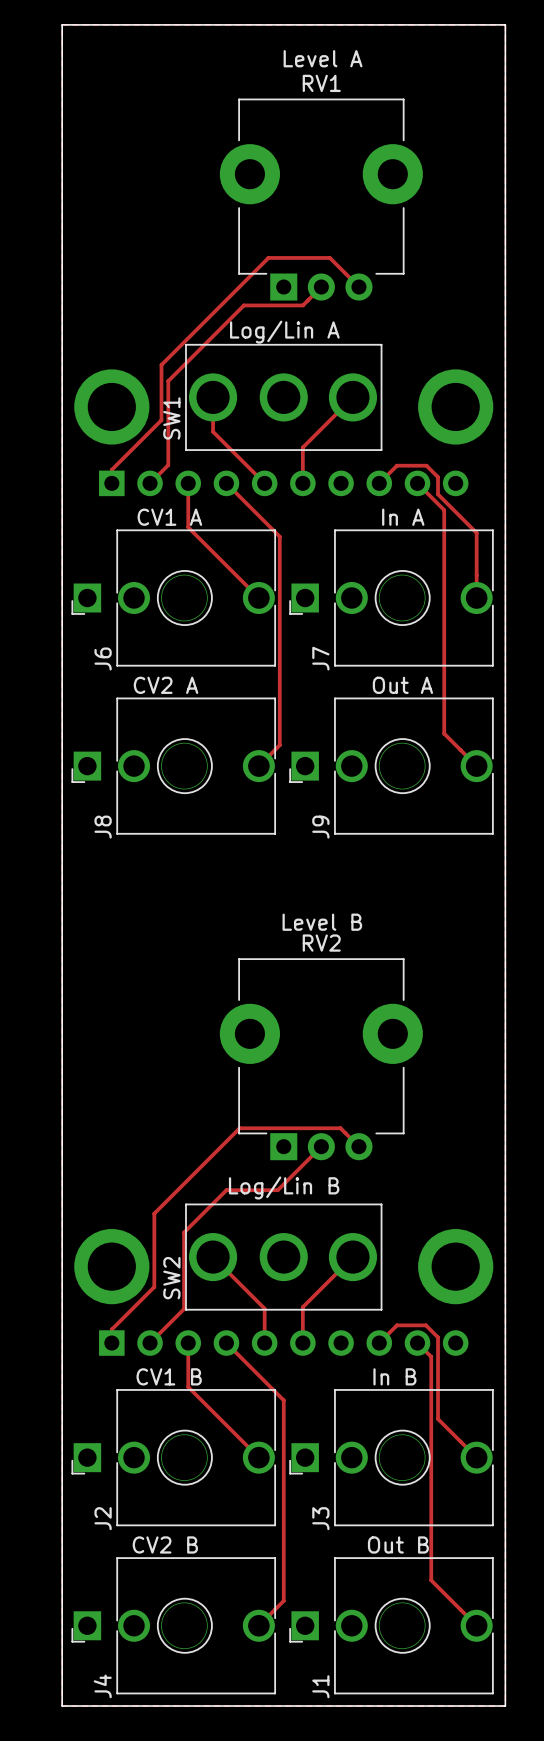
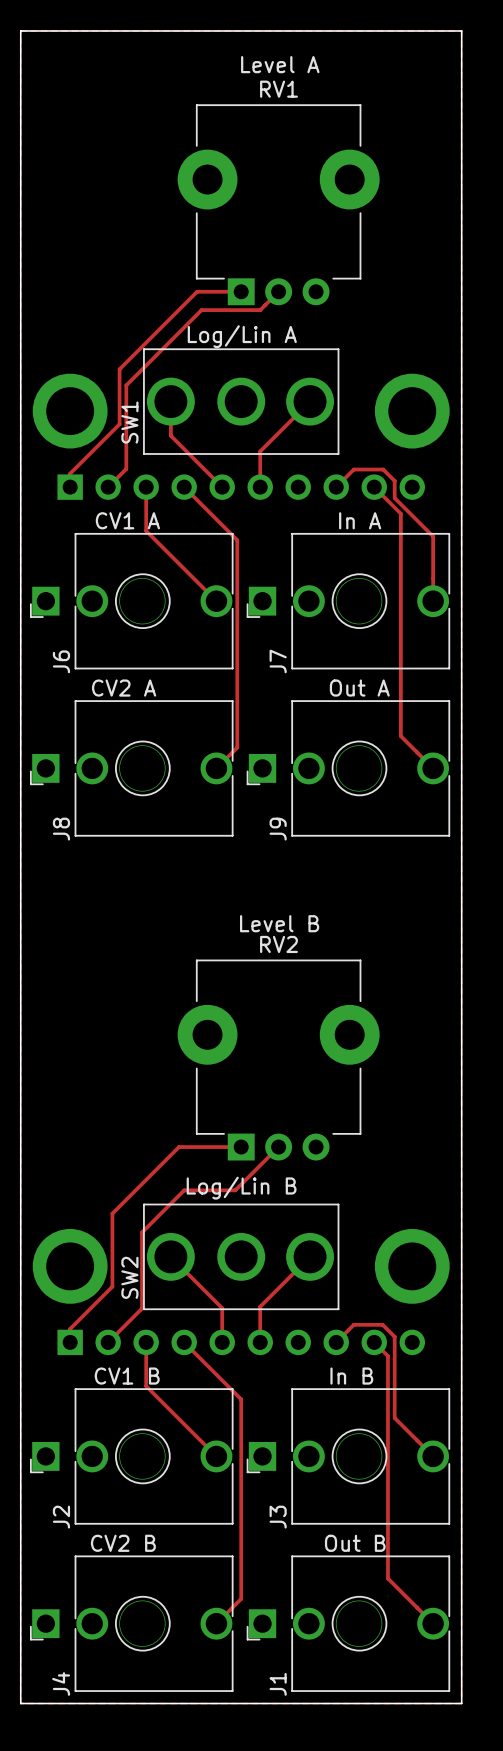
track: (239, 287) (268, 257) (329, 257) (358, 287) -> (197, 291) (241, 291)
track: (221, 1146) (239, 1128) (340, 1128) (358, 1146) -> (179, 1147) (241, 1147)

